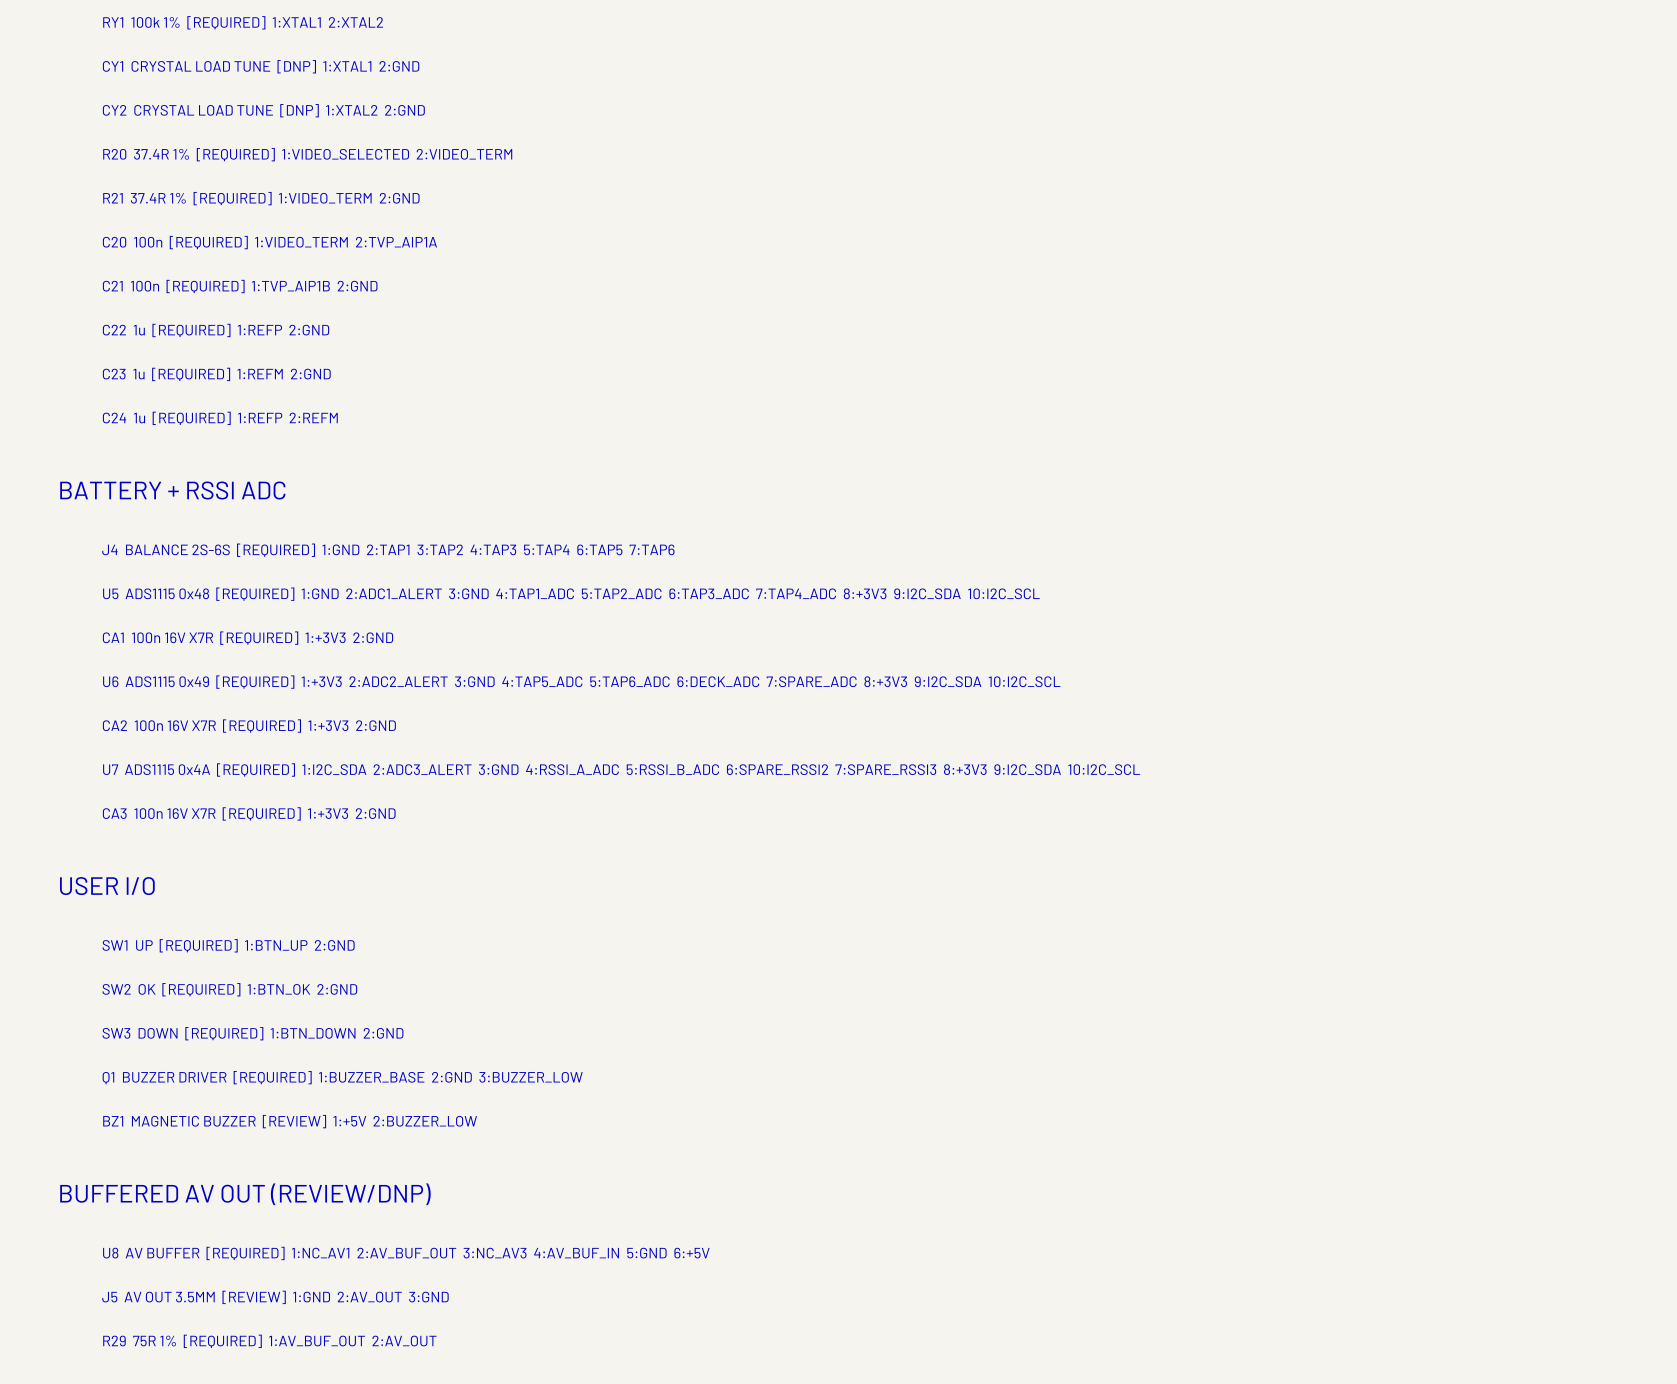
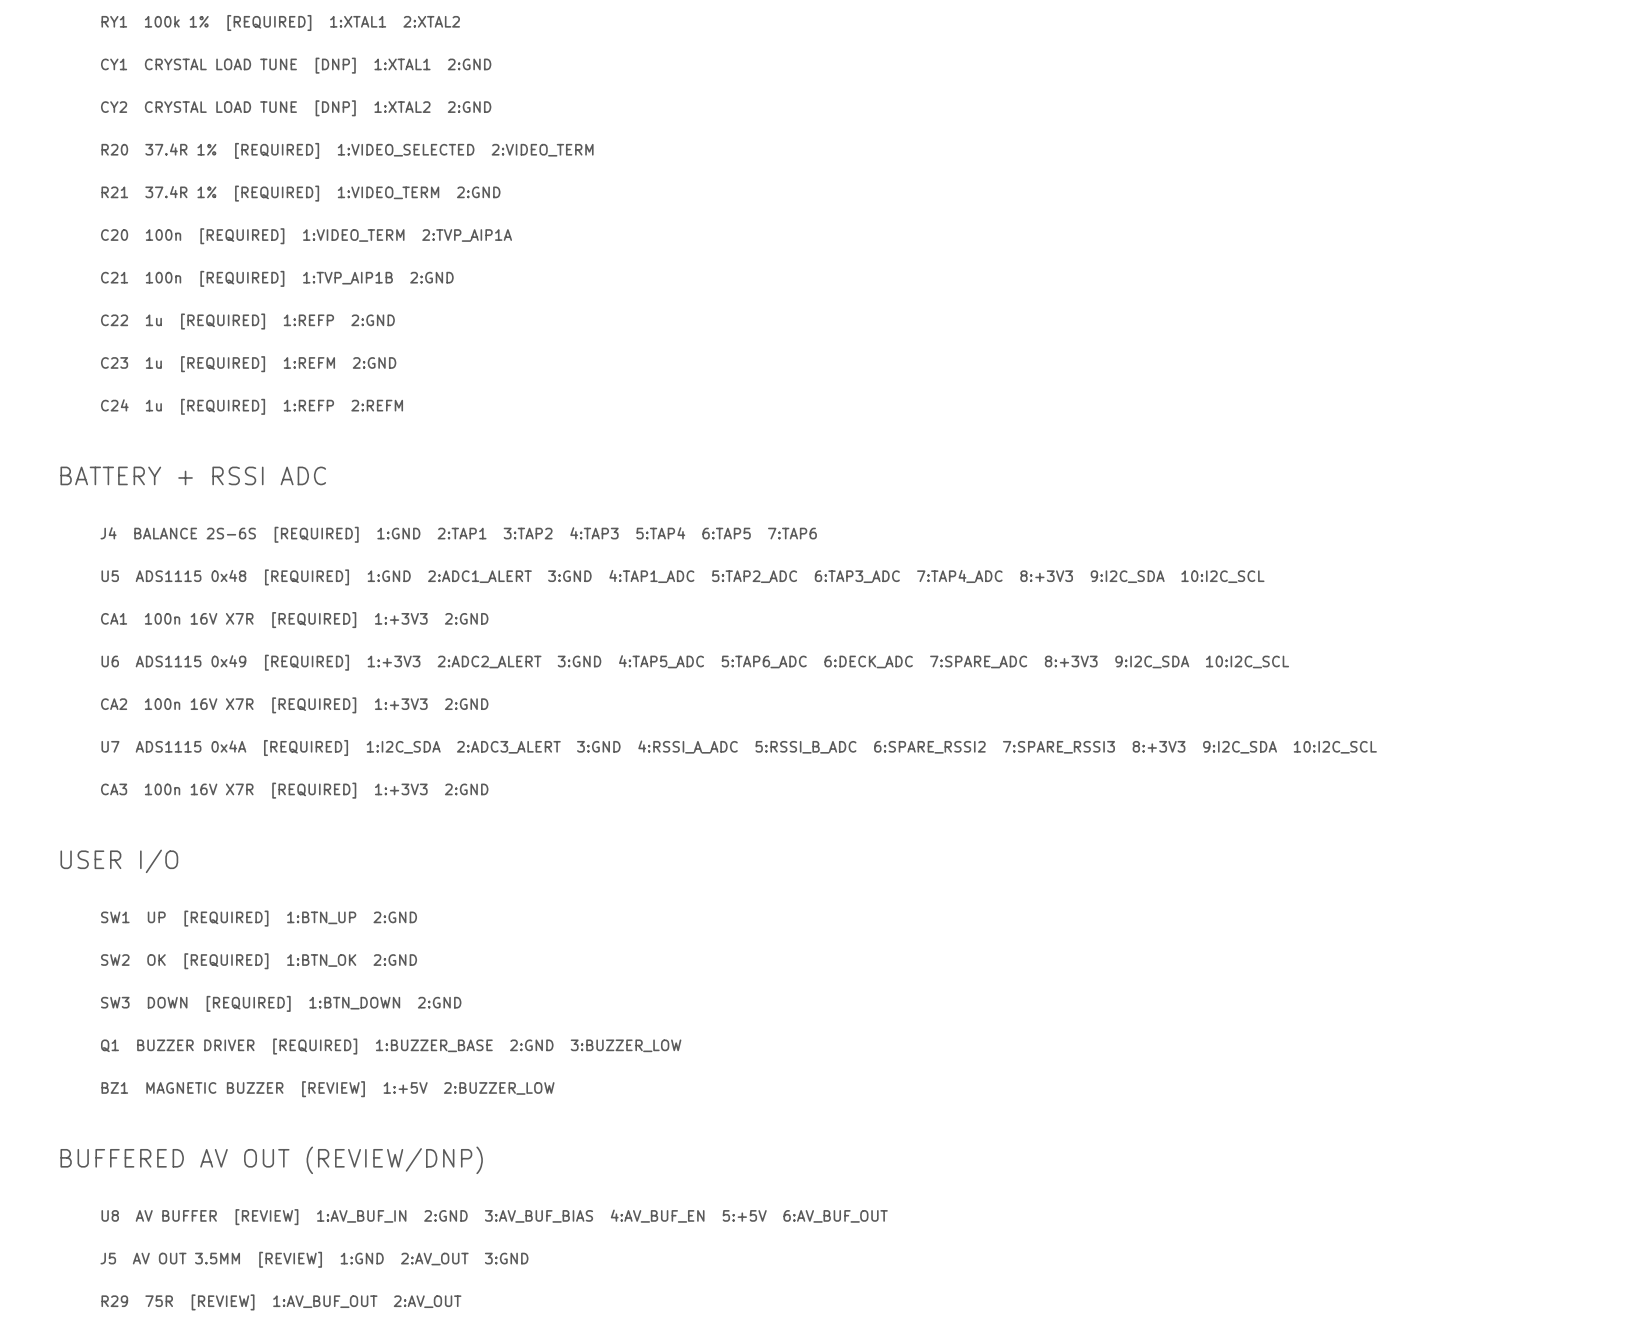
text: U8 AV BUFFER [REQUIRED] 1:NC_AV1 2:AV_BUF_OUT 3:NC_AV3 4:AV_BUF_IN 5:GND 6:+5V (406, 1253) -> U8 AV BUFFER [REVIEW] 1:AV_BUF_IN 2:GND 3:AV_BUF_BIAS 4:AV_BUF_EN 5:+5V 6:AV_BUF_OUT (494, 1217)
text: R29 75R 1% [REQUIRED] 1:AV_BUF_OUT 2:AV_OUT (269, 1341) -> R29 75R [REVIEW] 1:AV_BUF_OUT 2:AV_OUT (281, 1302)

